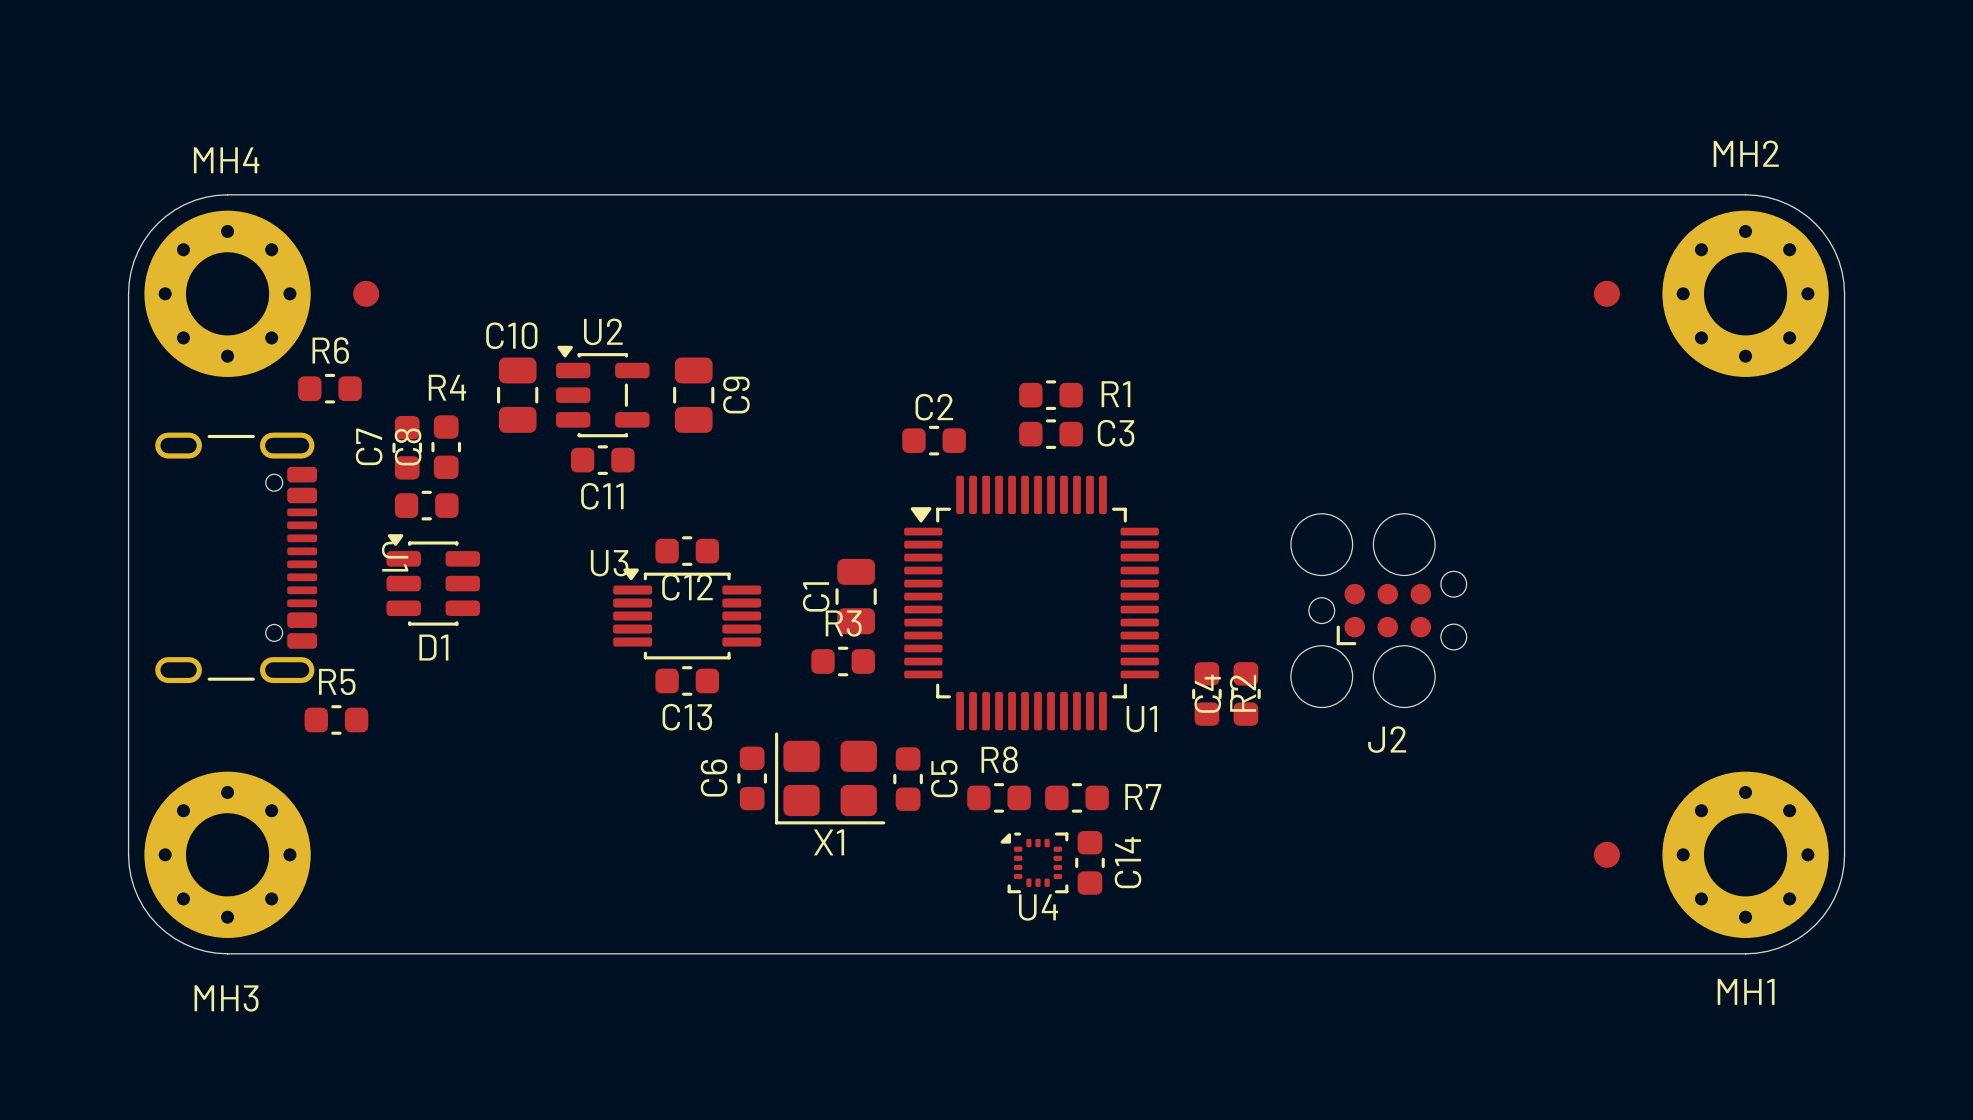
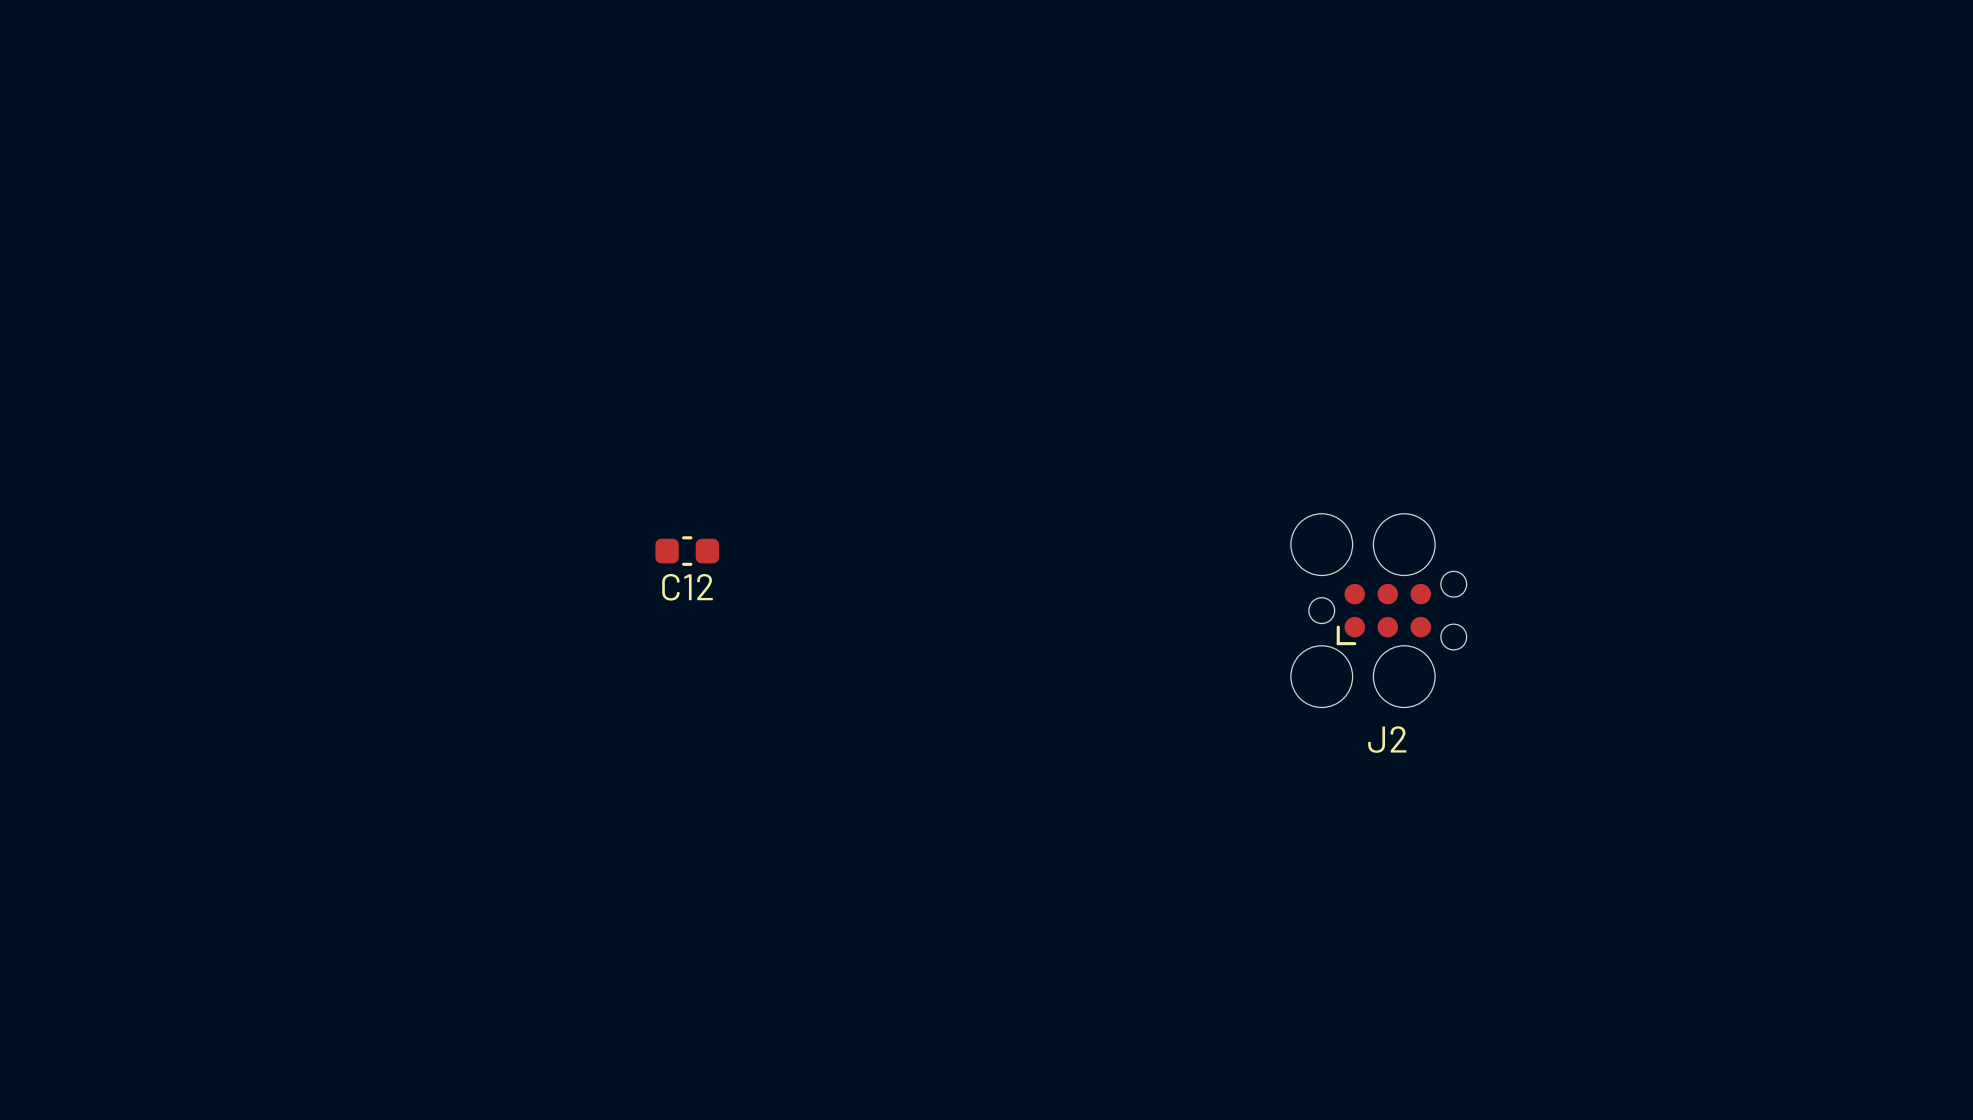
board edge: (227, 194) (1745, 194) (1767, 197) (1788, 204) (1815, 223) (1829, 241) (1839, 261) (1843, 282) (1844, 854) (1842, 876) (1834, 897) (1822, 916) (1798, 938) (1778, 948) (1745, 953) (227, 953) (205, 951) (184, 944) (165, 932) (150, 916) (138, 897) (129, 865) (129, 282) (138, 250) (157, 223) (184, 204) (205, 197) (227, 194) -> none
MH4: (227, 293) -> none
part: (366, 293) -> none
part: (1606, 293) -> none
MH2: (1745, 293) -> none
R6: (329, 388) -> none
U2: (602, 391) -> none
C10: (517, 395) -> none
C9: (693, 395) -> none
R1: (1051, 395) -> none
C3: (1051, 434) -> none
C2: (934, 440) -> none
C7: (407, 447) -> none
C8: (446, 447) -> none
C11: (602, 460) -> none
R4: (426, 505) -> none
J1: (236, 557) -> none
D1: (433, 579) -> none
C1: (856, 596) -> none
U1: (1031, 603) -> none
U3: (687, 613) -> none
R3: (843, 661) -> none
C13: (687, 680) -> none
R2: (1206, 693) -> none
C4: (1245, 693) -> none
R5: (336, 719) -> none
C6: (752, 778) -> none
X1: (830, 778) -> none
C5: (908, 779) -> none
R8: (999, 797) -> none
R7: (1076, 797) -> none
MH3: (227, 854) -> none
part: (1606, 854) -> none
MH1: (1745, 854) -> none
U4: (1034, 862) -> none
C14: (1089, 862) -> none

